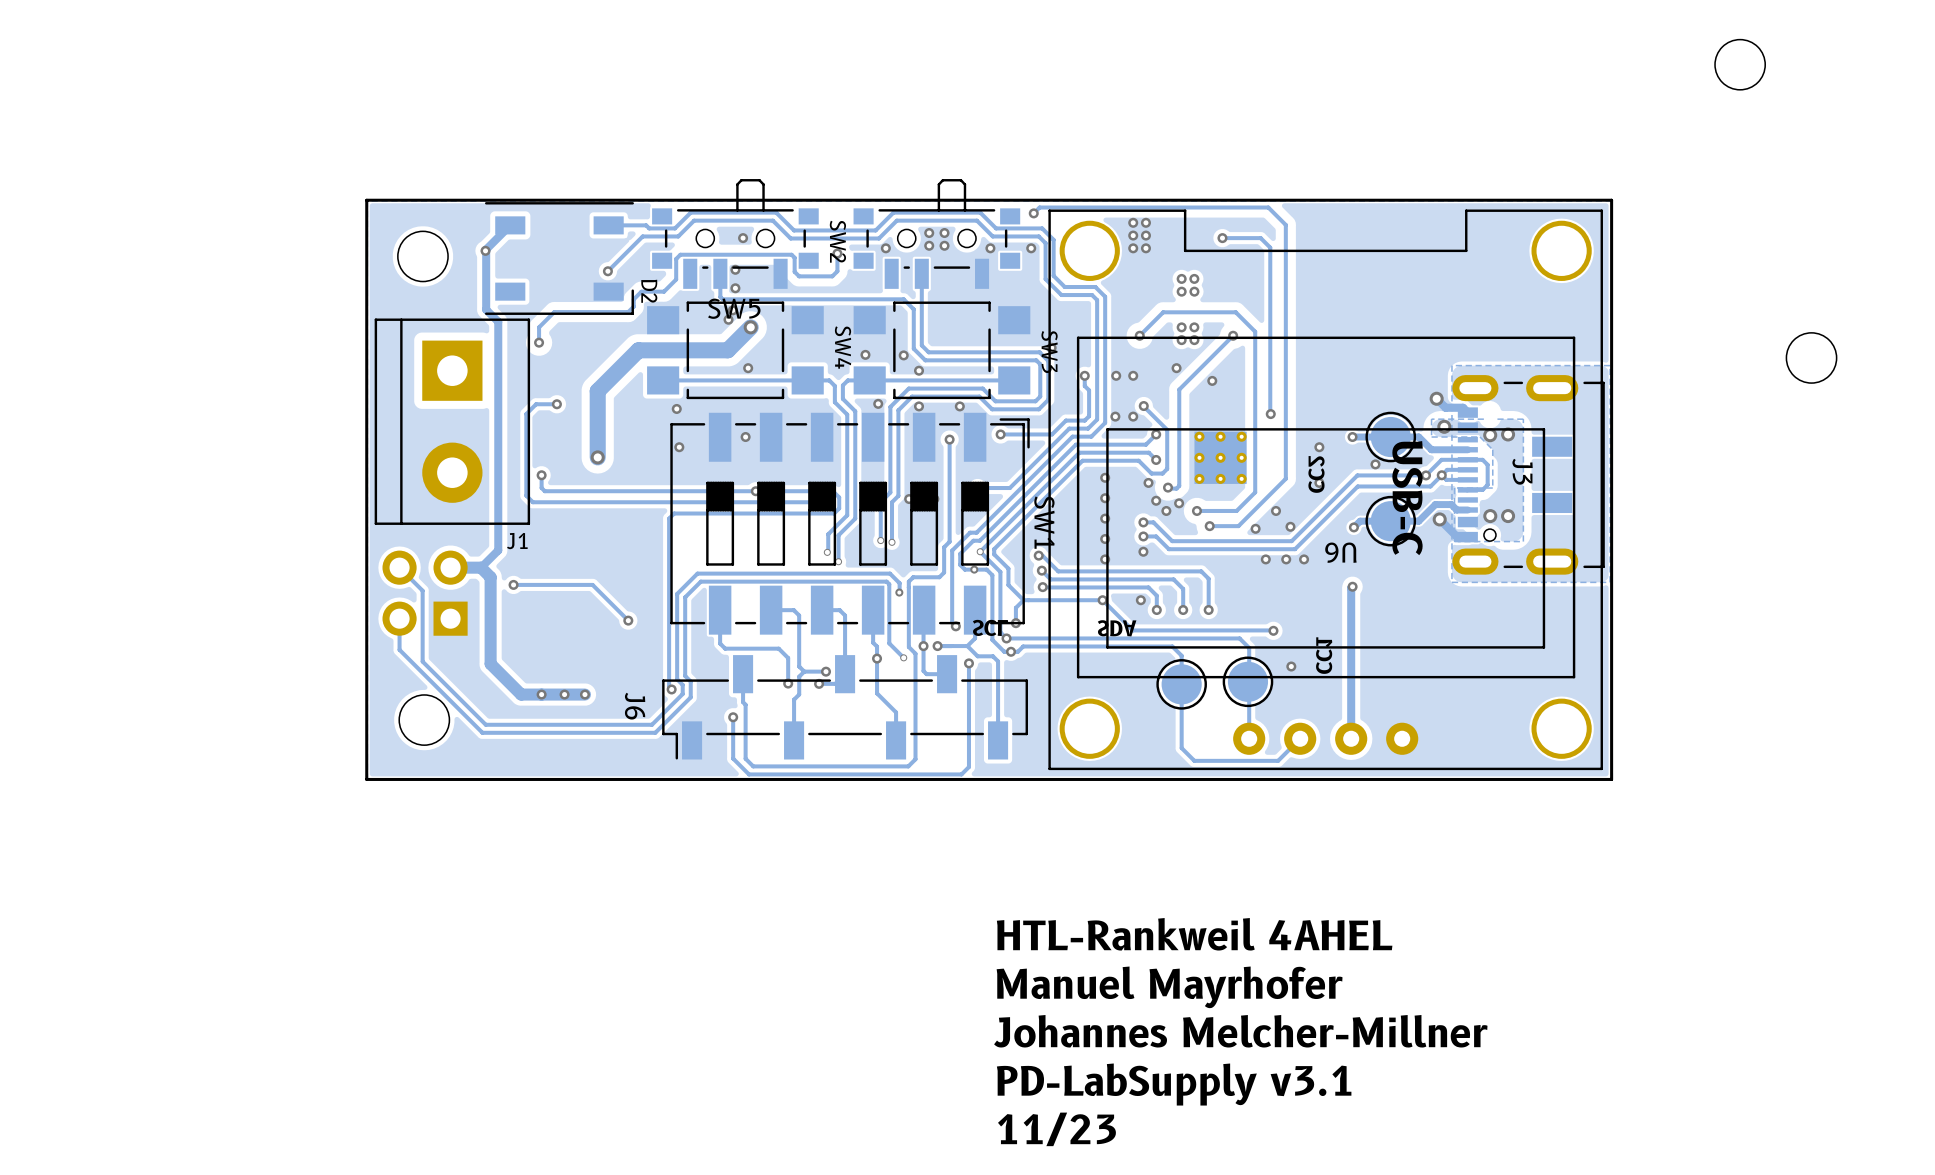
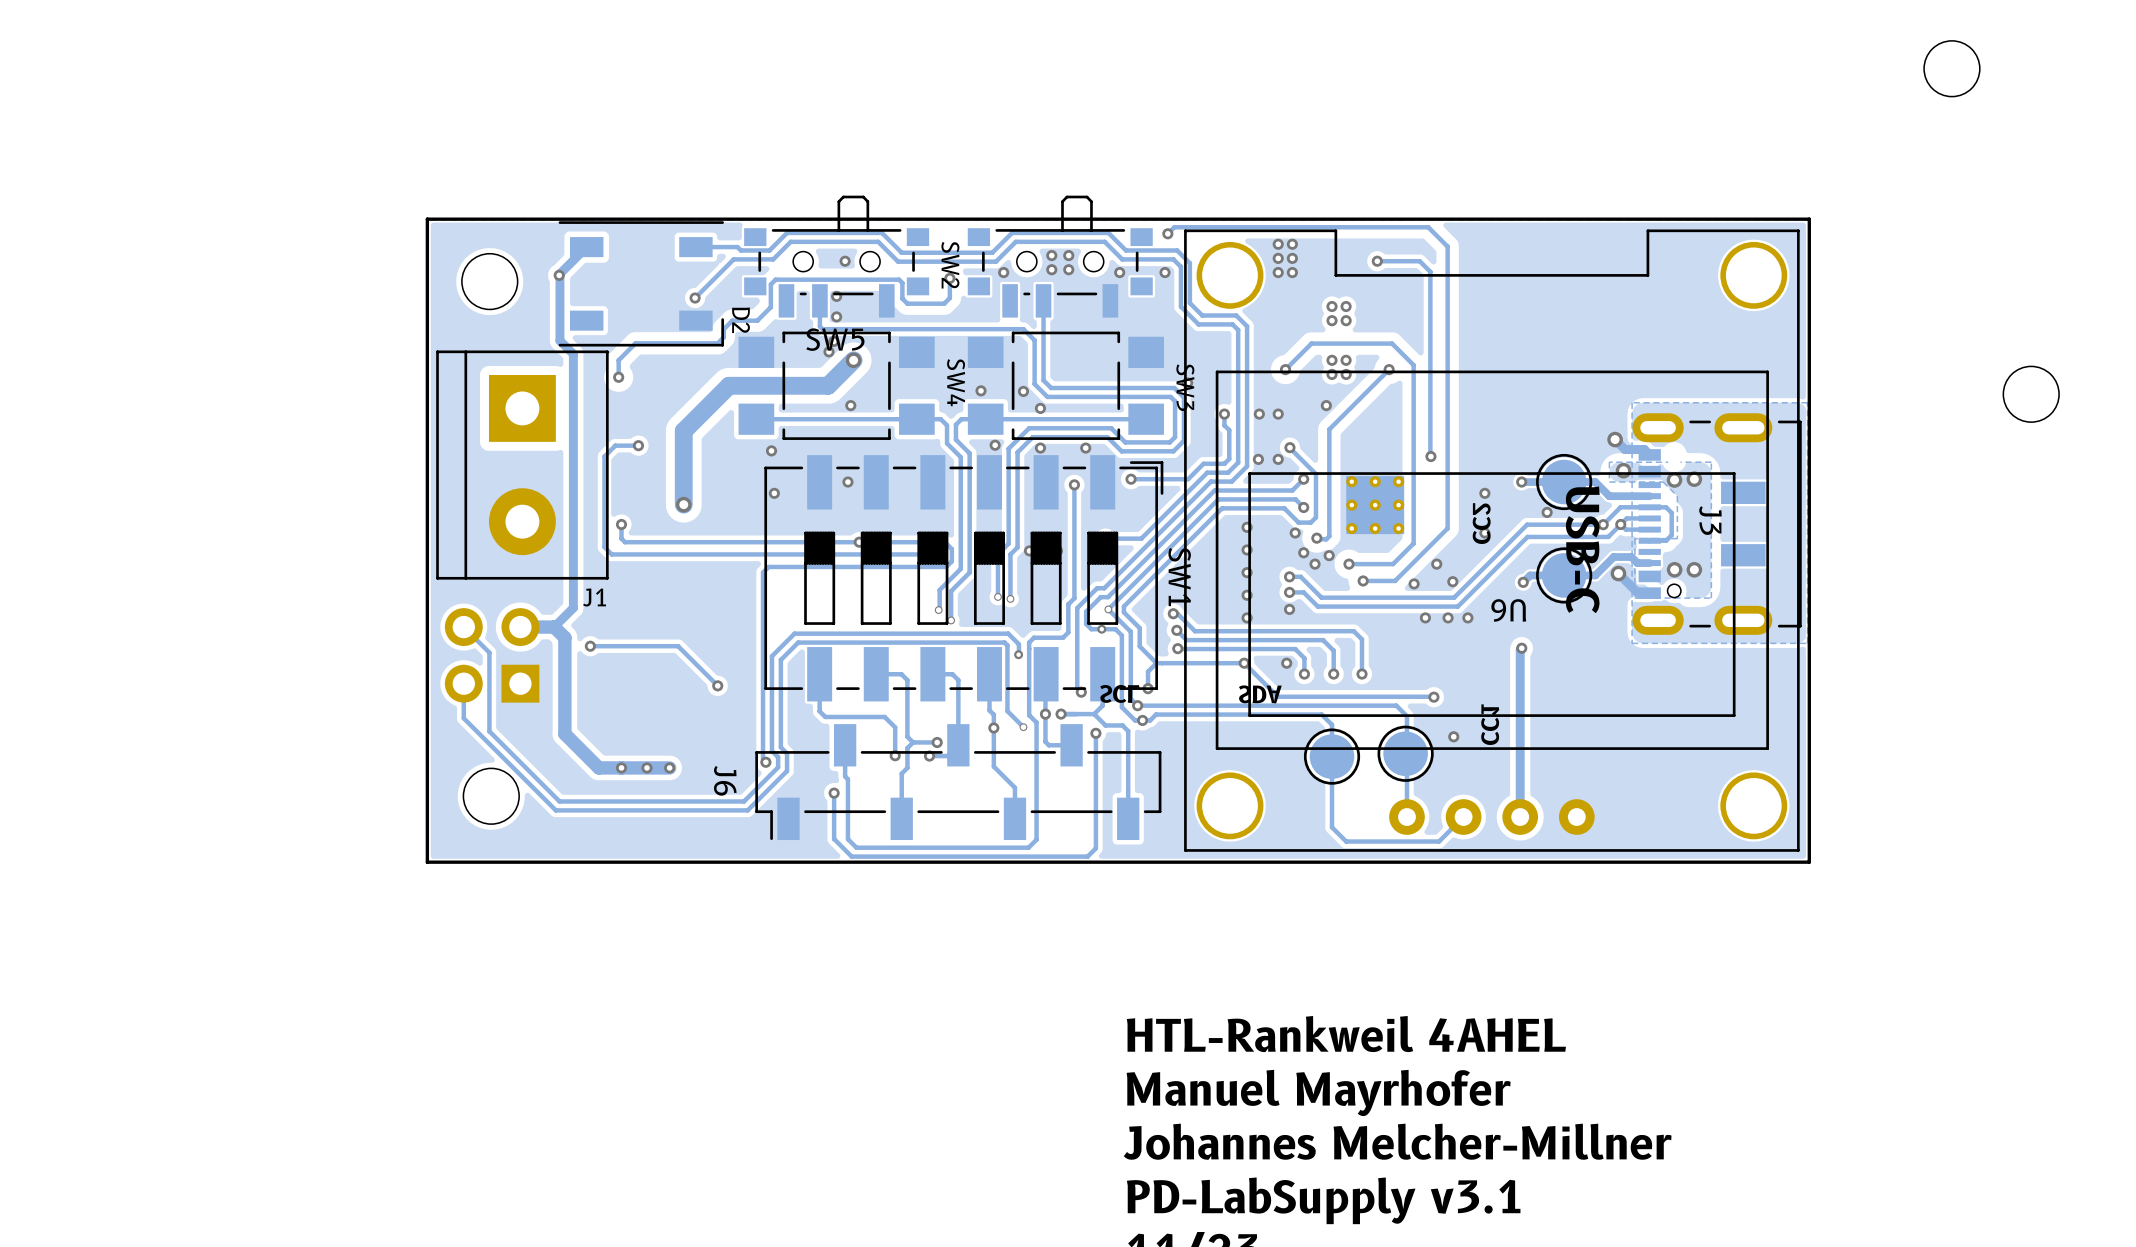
via: (1212, 380) -> none

